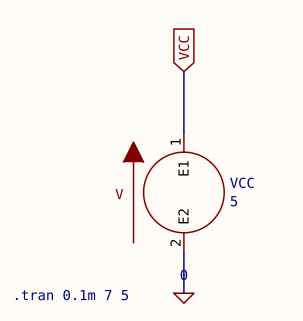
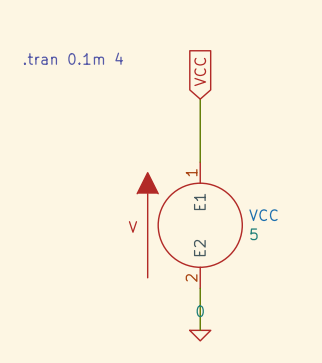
text: none -> .tran 0.1m 4 (73, 58)
text: .tran 0.1m 7 5 (71, 295) -> none

